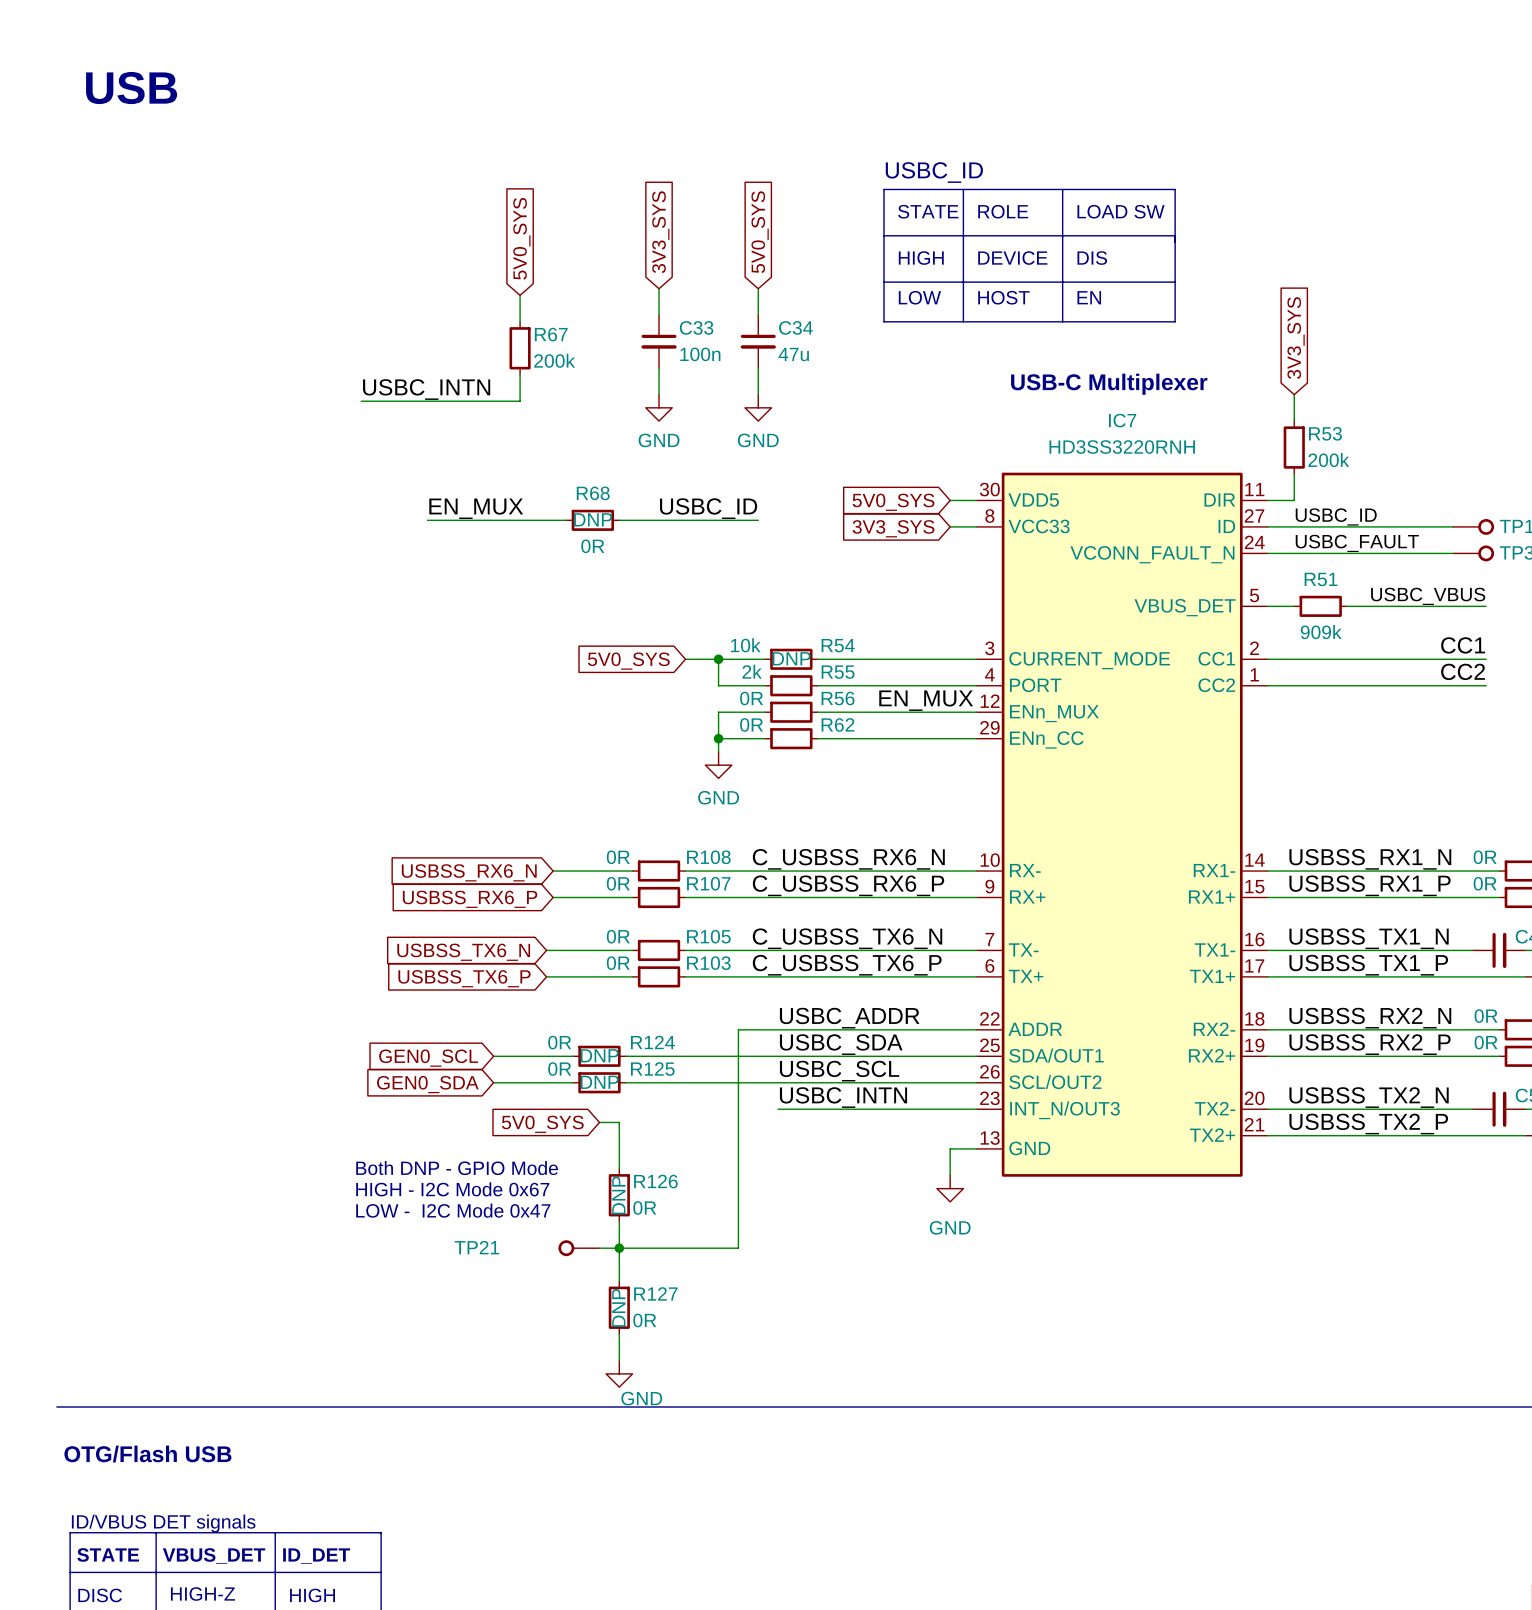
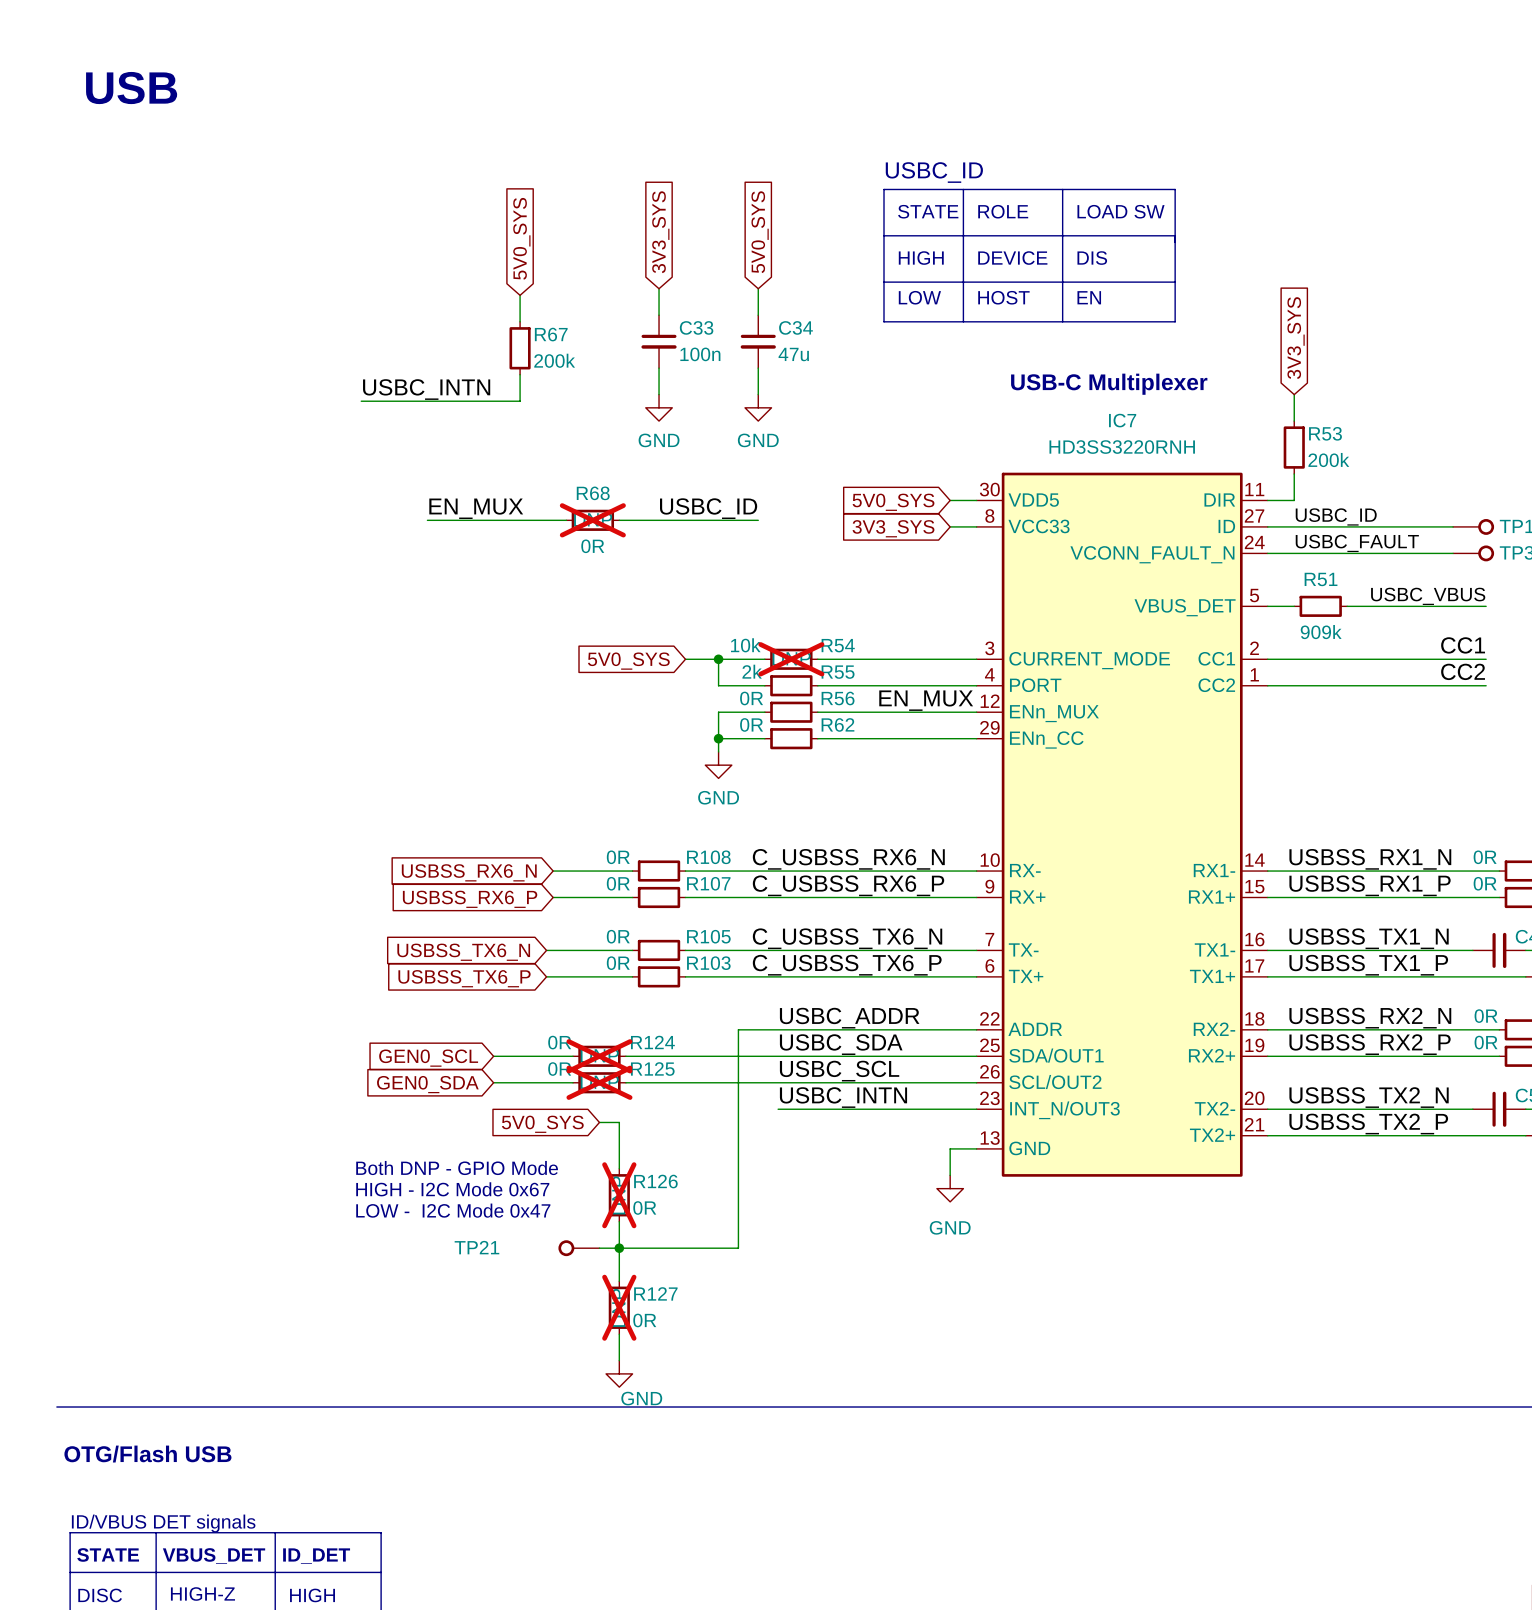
R68 do-not-place cross: none -> (592, 520)
R54 do-not-place cross: none -> (791, 659)
R124 do-not-place cross: none -> (599, 1056)
R125 do-not-place cross: none -> (599, 1082)
R126 do-not-place cross: none -> (619, 1195)
R127 do-not-place cross: none -> (619, 1307)

